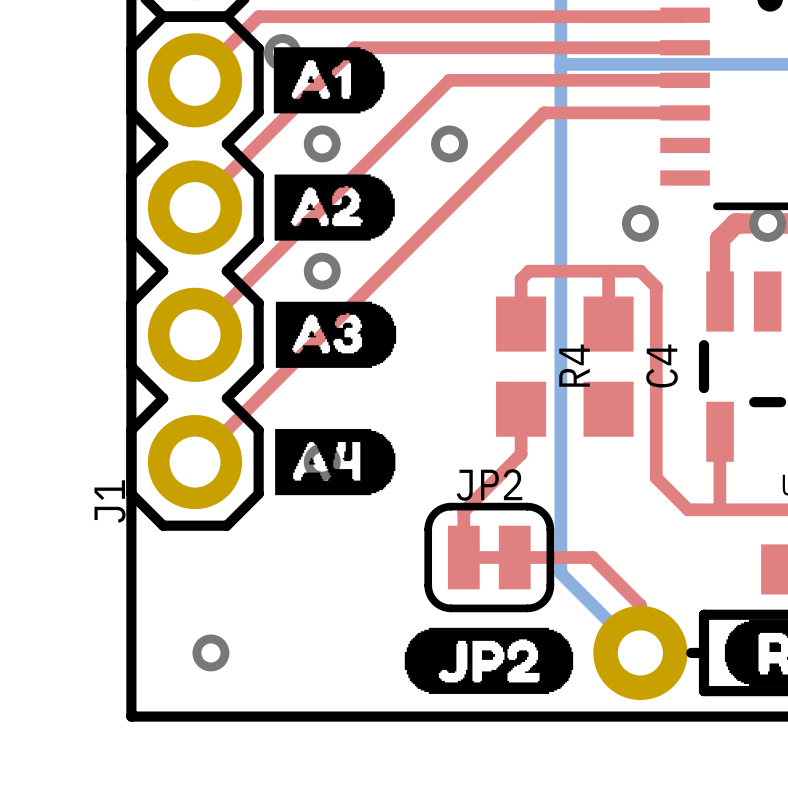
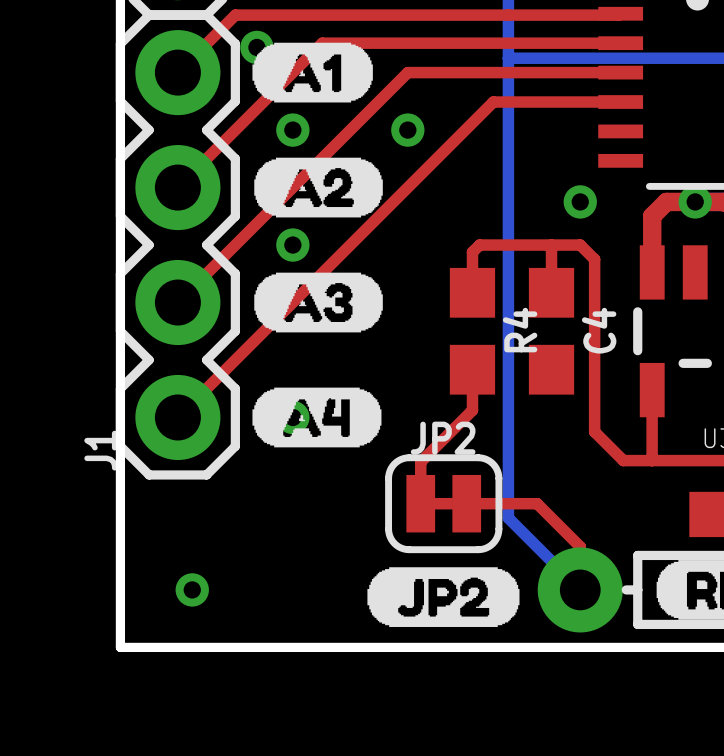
drawing shape: [273, 47, 385, 114] -> [252, 42, 373, 103]
drawing shape: [274, 174, 395, 241] -> [254, 157, 383, 218]
drawing shape: [275, 301, 397, 368] -> [254, 272, 383, 333]
drawing shape: [275, 429, 396, 496] -> [252, 387, 382, 448]

